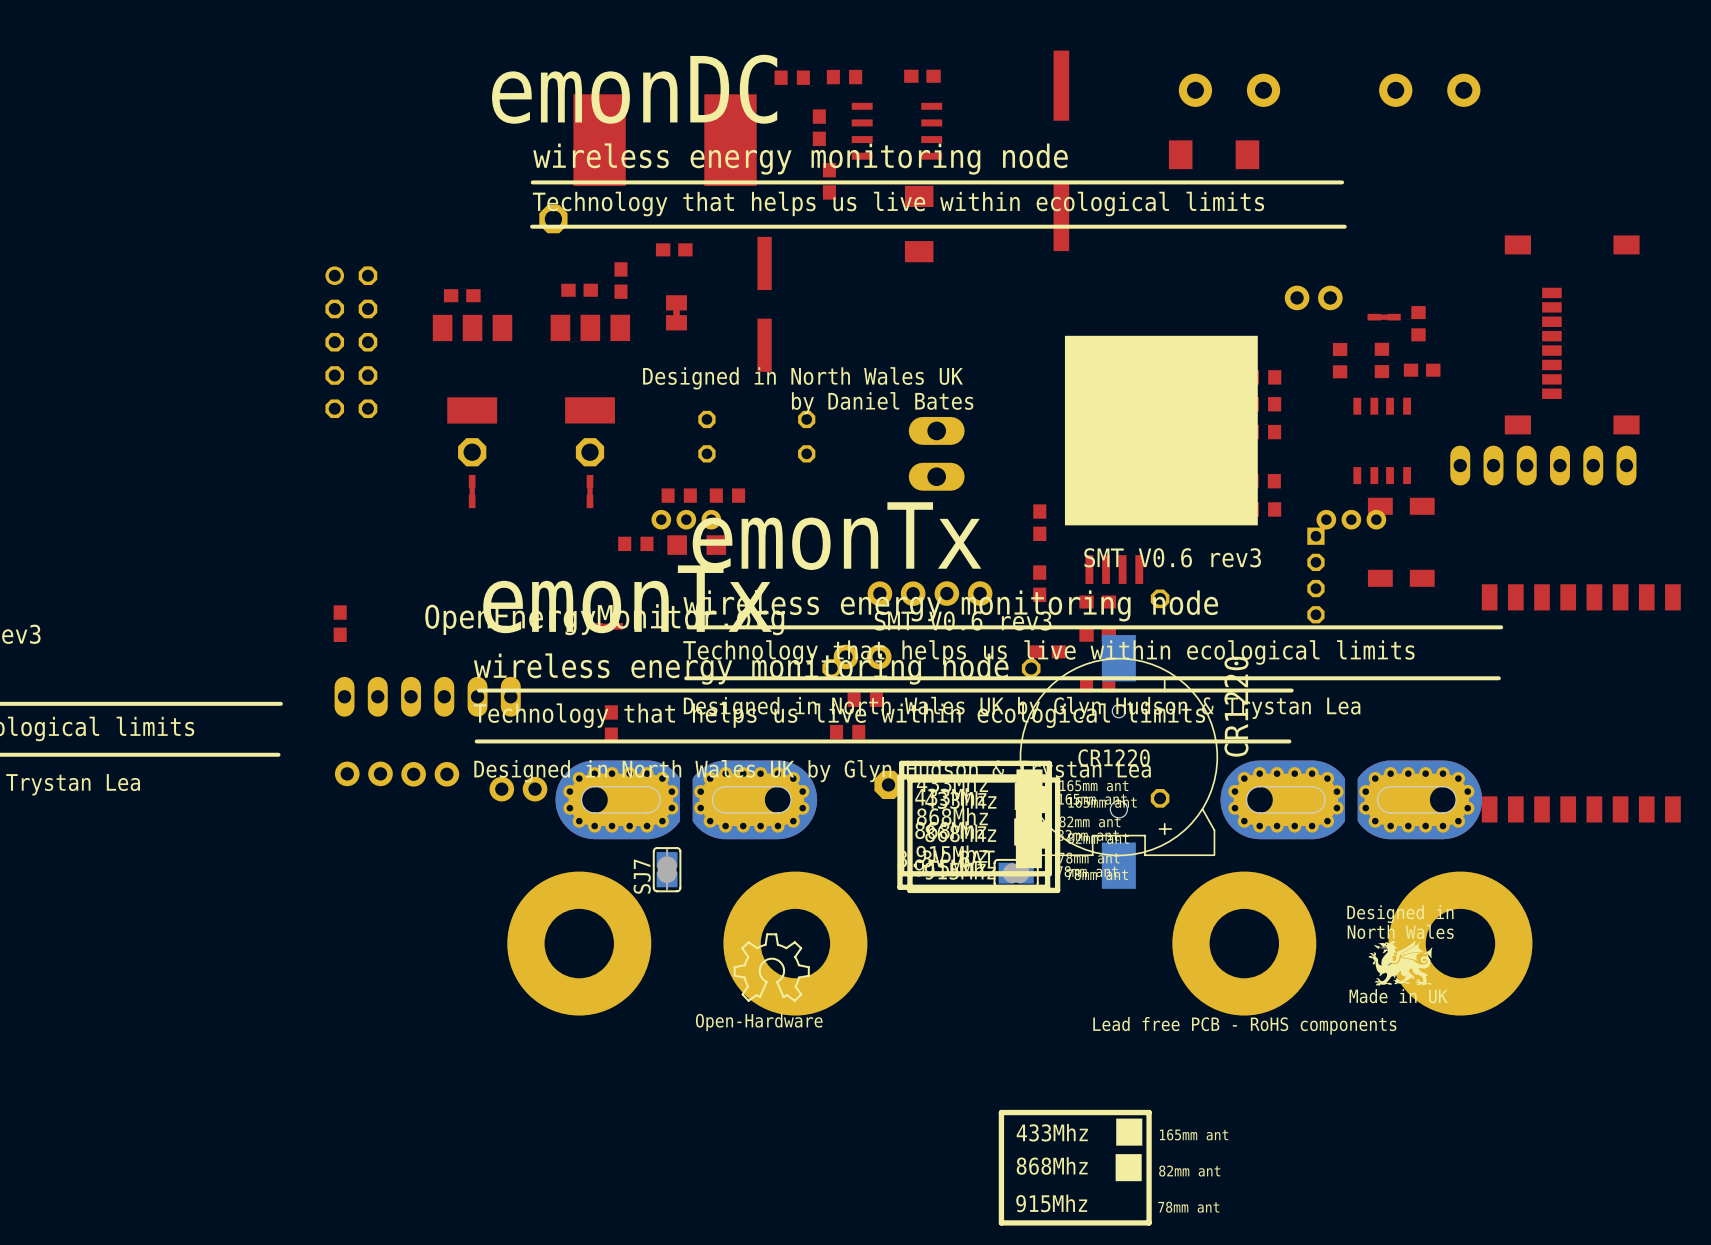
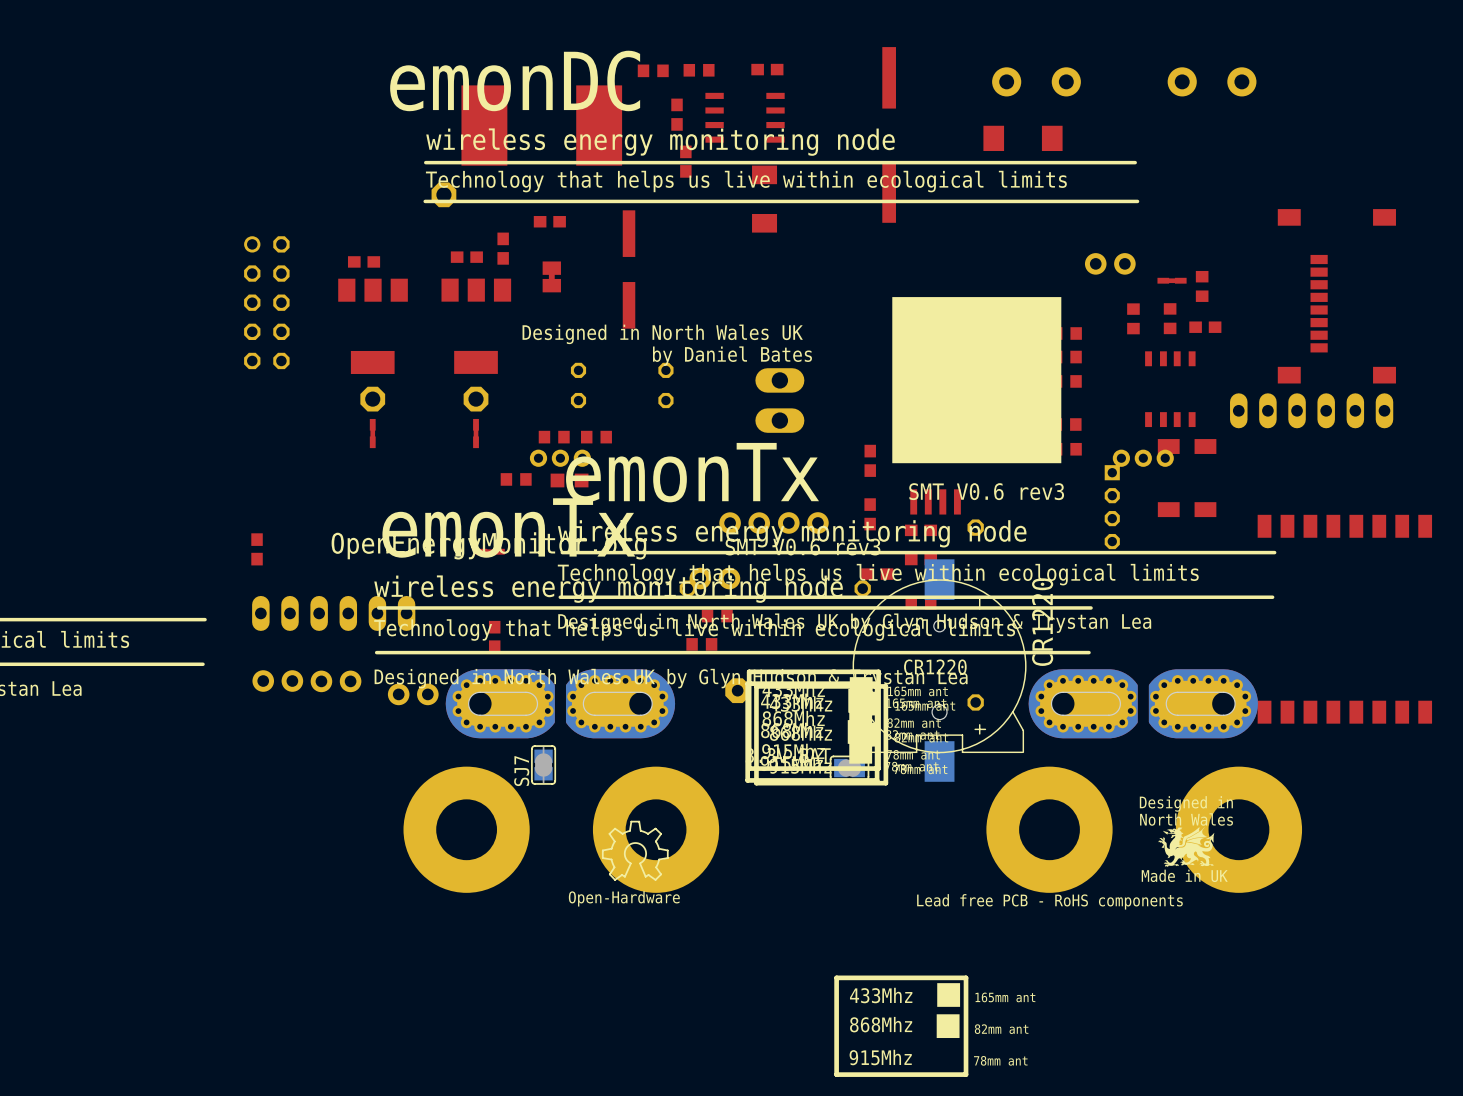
part footprint: [667, 535, 727, 555] -> [550, 473, 589, 488]

